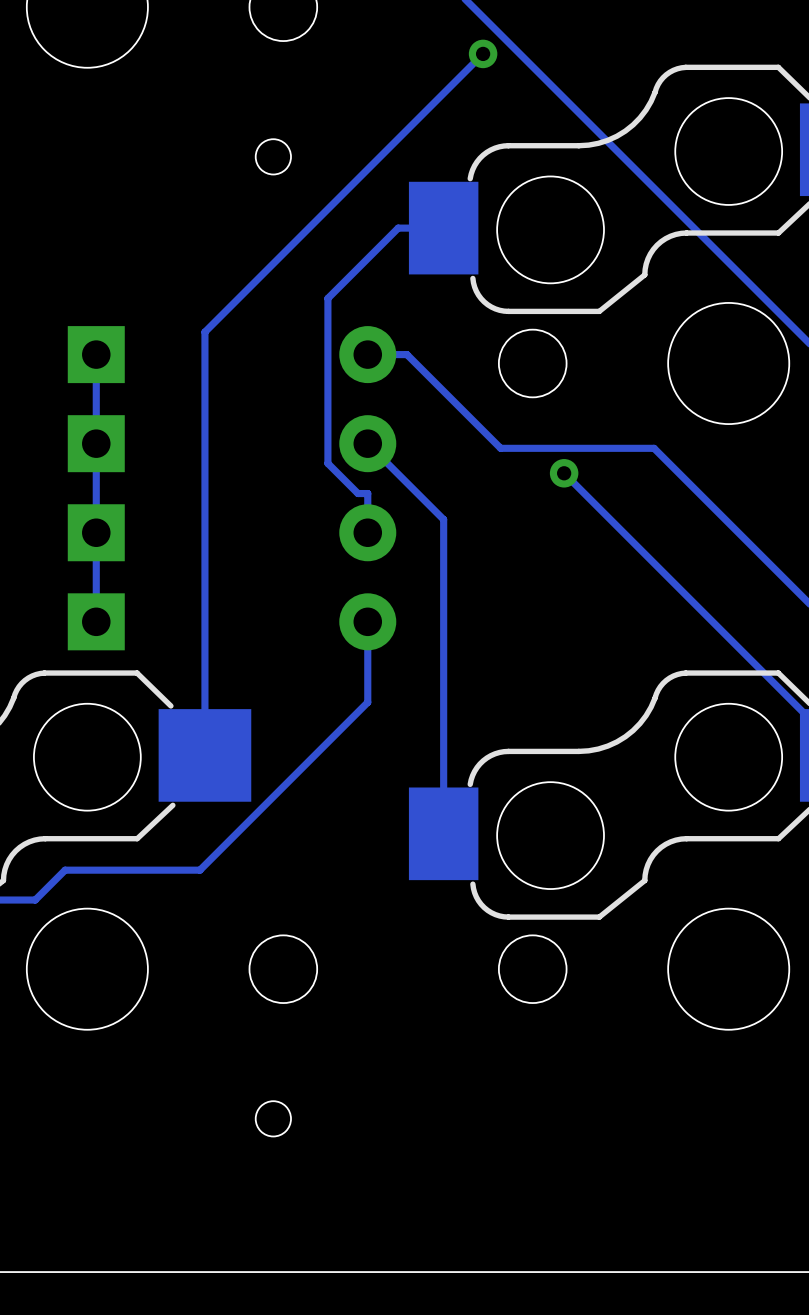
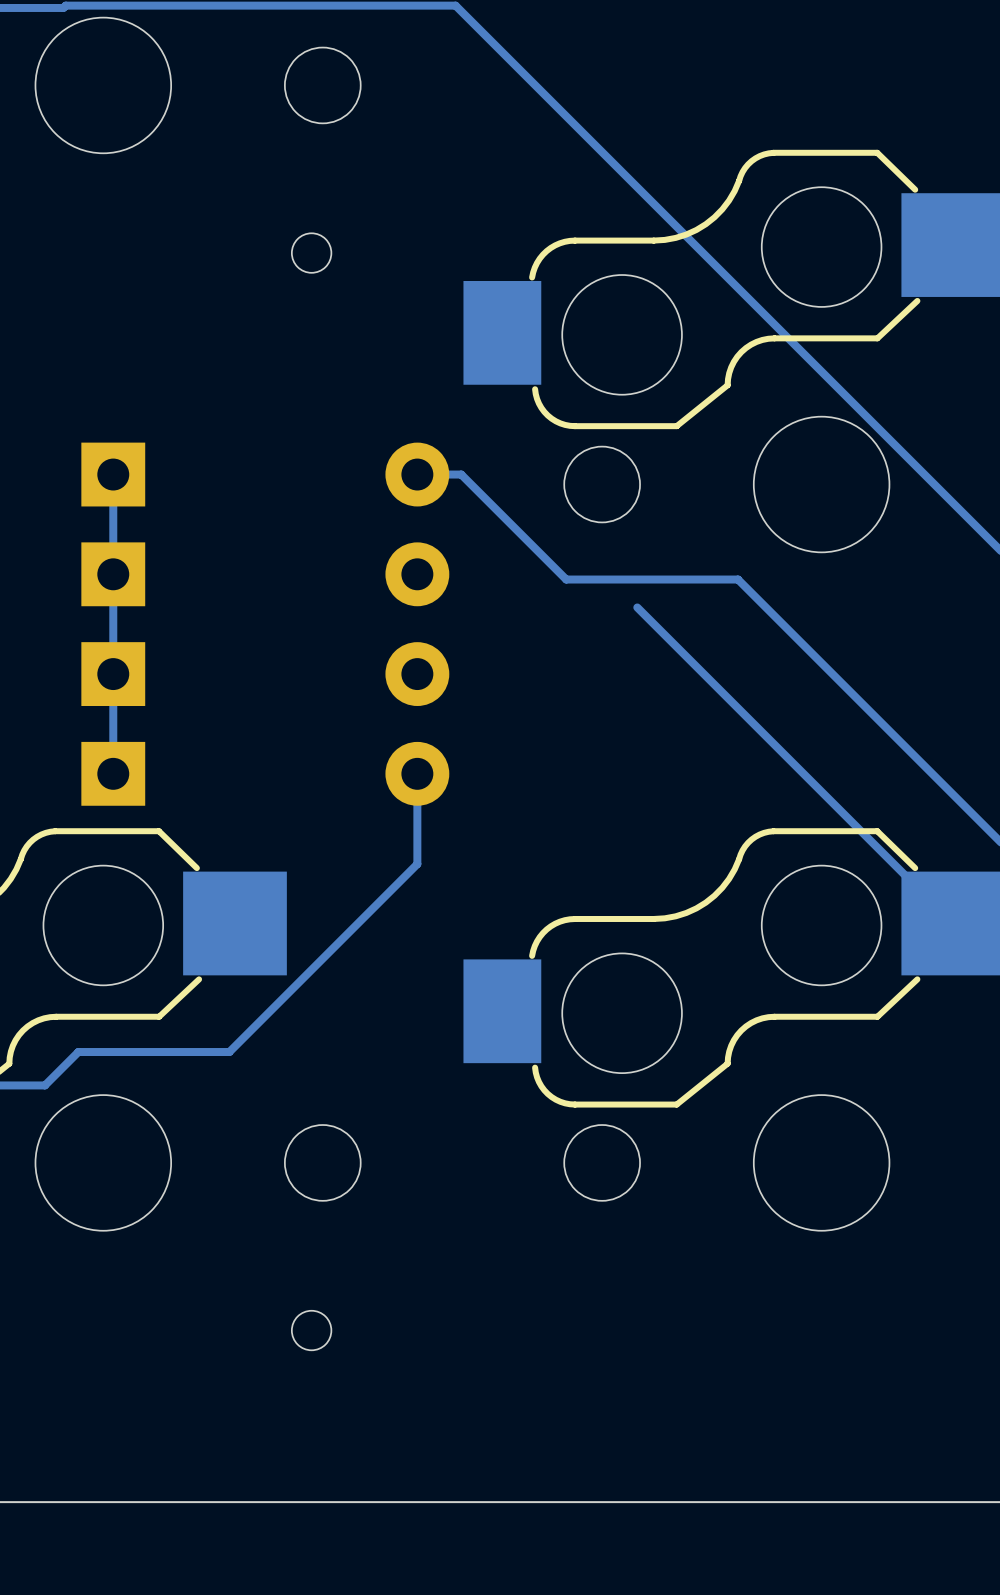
track: (483, 53) (204, 332) (204, 755) -> none
via: (483, 53) -> none
track: (443, 228) (398, 228) (327, 298) (327, 463) (357, 493) (367, 493) (367, 532) -> none
track: (367, 443) (443, 519) (443, 833) -> none
via: (564, 473) -> none

